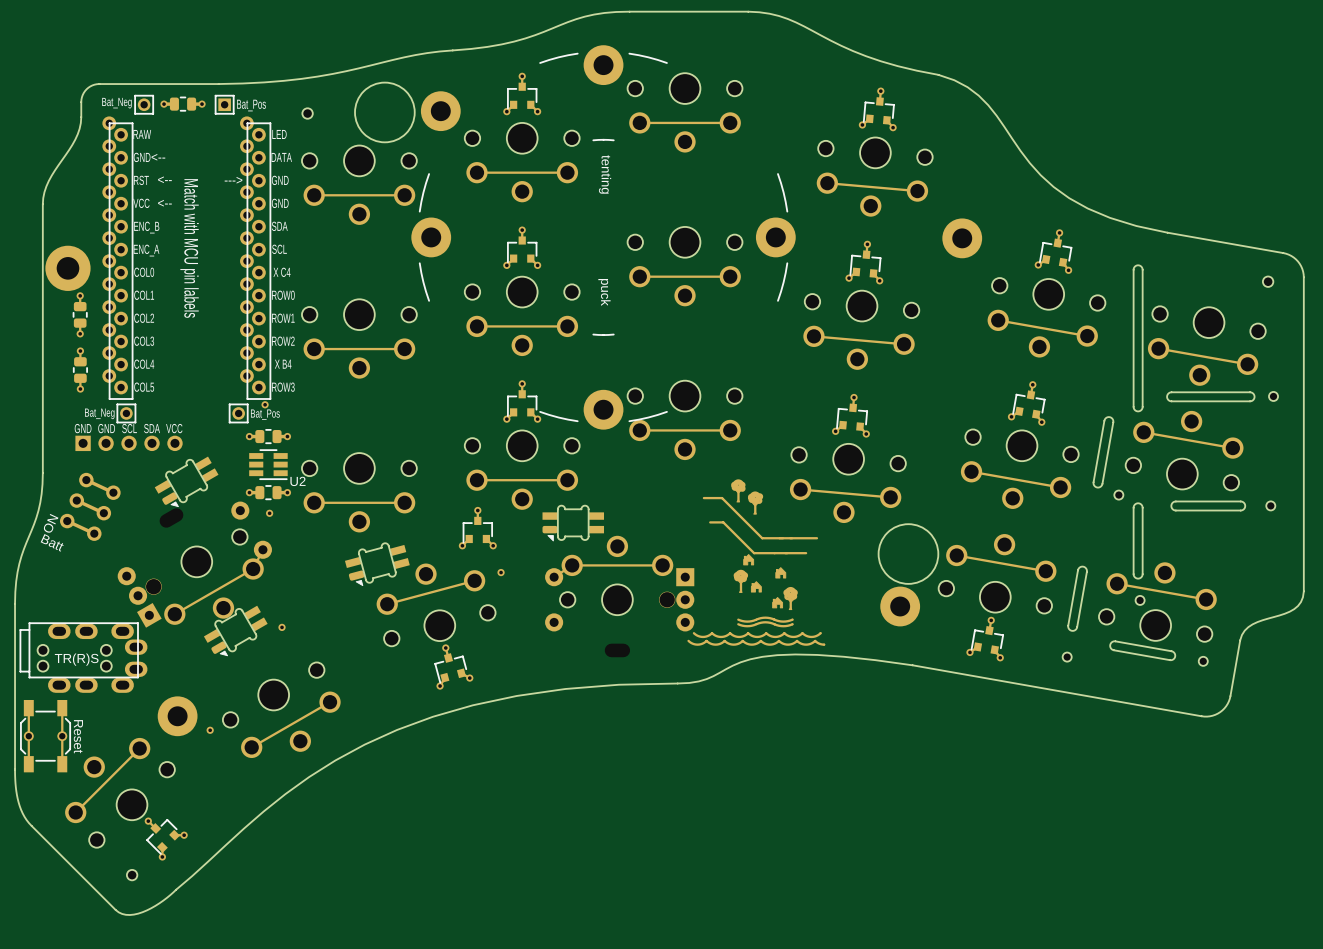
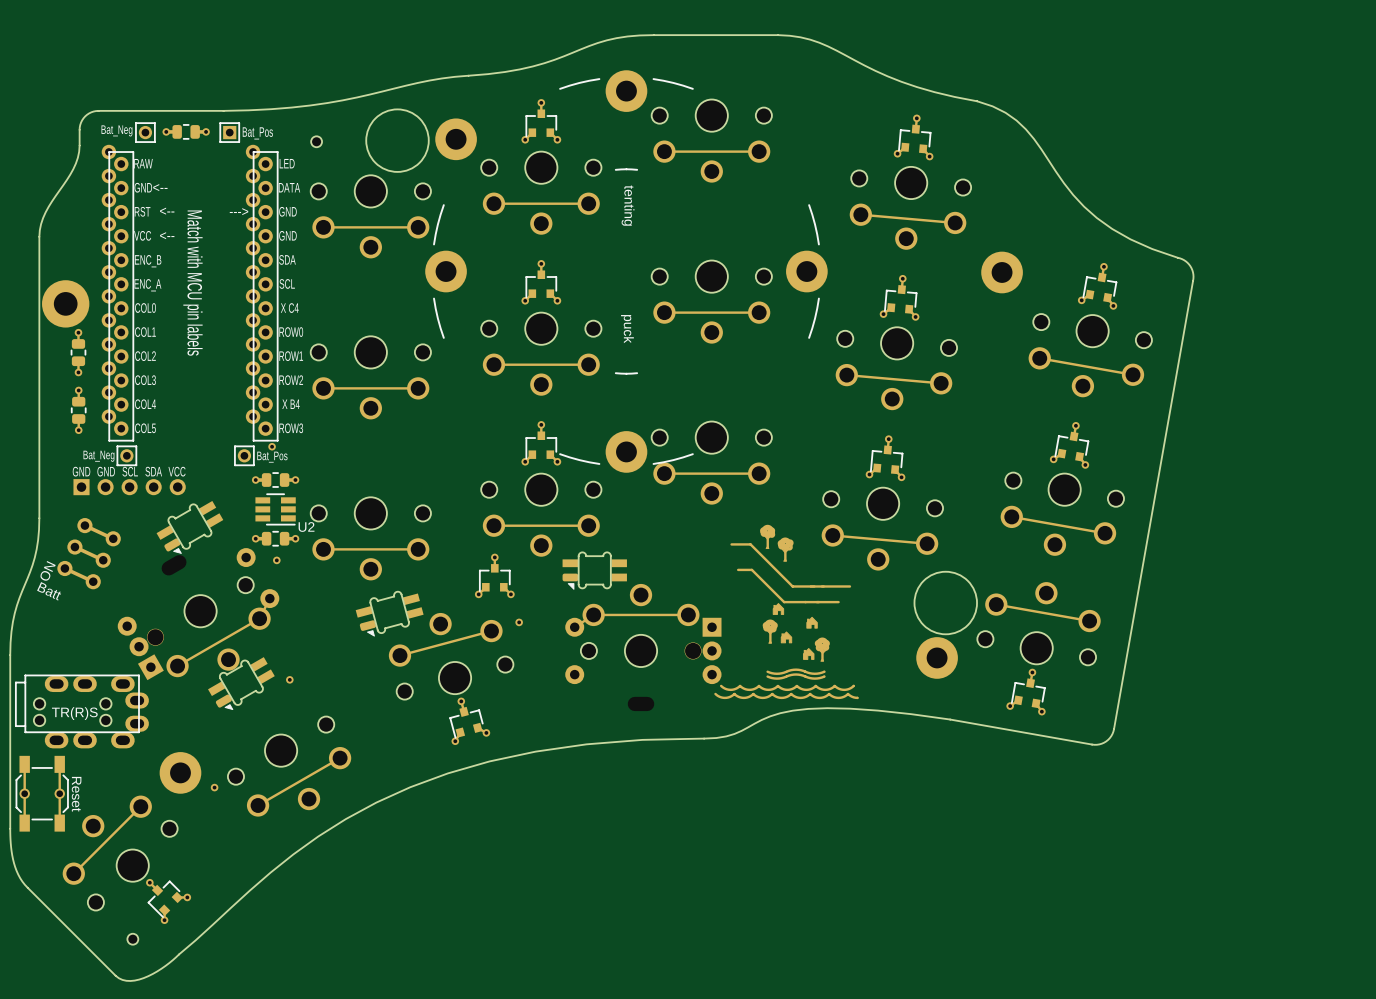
board edge: (748, 11) (769, 13) (787, 18) (866, 56) (897, 66) (938, 74) (967, 87) (988, 105) (1020, 150) (1040, 175) (1069, 198) (1087, 208) (1136, 226) (1286, 253) (1296, 259) (1301, 266) (1303, 277) (1303, 591) (1300, 602) (1289, 611) (1257, 622) (1244, 630) (1240, 640) (1229, 698) (1224, 708) (1215, 714) (1201, 716) (1048, 689) -> (778, 35) (800, 37) (819, 42) (901, 81) (934, 92) (977, 101) (1005, 112) (1025, 129) (1073, 194) (1096, 217) (1130, 239) (1184, 260) (1191, 268) (1193, 278) (1114, 729) (1106, 741) (1092, 744)
board edge: (1142, 269) (1142, 406) (1138, 411) (1133, 406) (1133, 269) (1138, 265) (1142, 269) -> none
part: (1268, 281) -> none
part: (1206, 346) -> none
board edge: (1250, 392) (1171, 392) (1167, 396) (1171, 401) (1250, 401) (1254, 396) (1250, 392) -> none
part: (1273, 396) -> none
board edge: (1104, 420) (1093, 482) (1097, 487) (1102, 483) (1113, 421) (1109, 417) (1104, 420) -> none
part: (1184, 450) -> none
part: (1118, 495) -> none
board edge: (1240, 501) (1175, 501) (1171, 506) (1175, 510) (1241, 510) (1245, 505) (1240, 501) -> none
part: (1270, 505) -> none
board edge: (1142, 507) (1142, 574) (1137, 578) (1133, 574) (1133, 507) (1138, 503) (1142, 507) -> none
board edge: (1077, 570) (1068, 626) (1072, 630) (1077, 627) (1086, 571) (1083, 566) (1077, 570) -> none
part: (1140, 600) -> none
part: (1157, 602) -> none
board edge: (1115, 641) (1172, 651) (1175, 657) (1169, 660) (1113, 650) (1110, 644) (1115, 641) -> none
part: (1067, 657) -> none
part: (1203, 661) -> none

